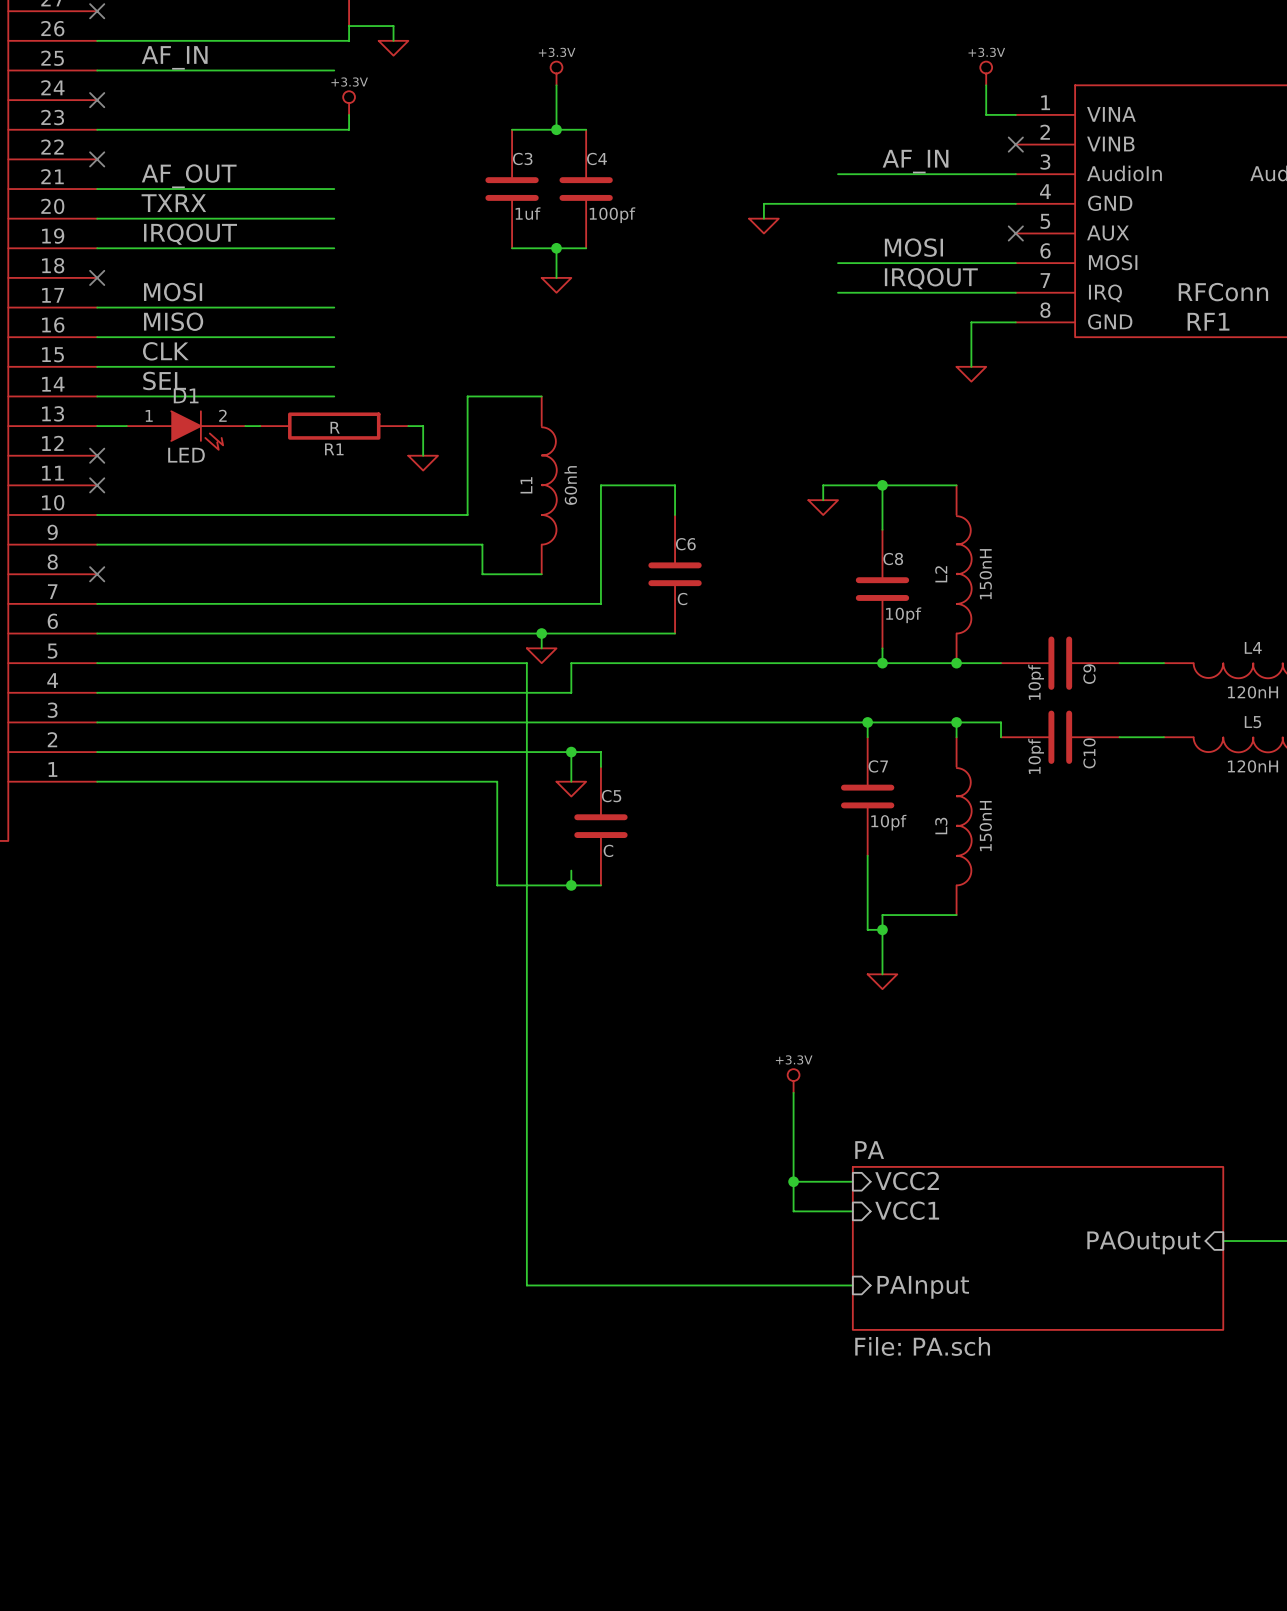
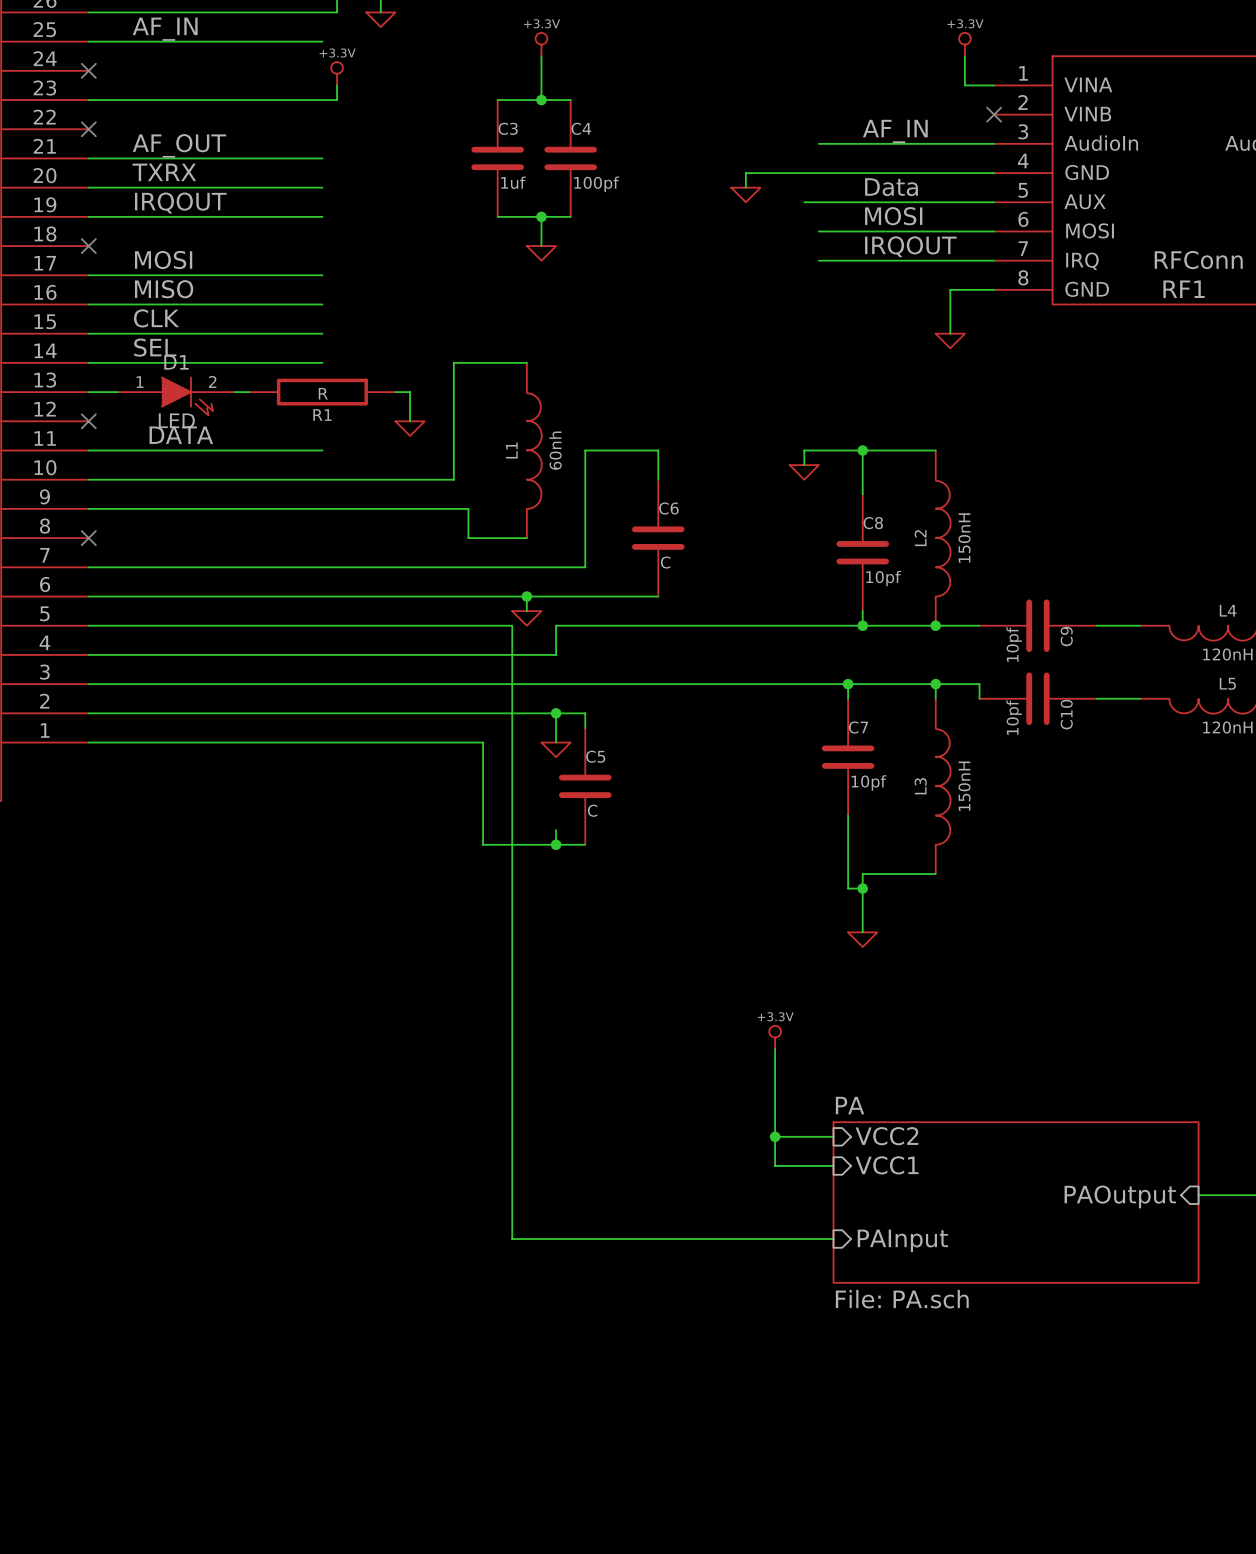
label: none -> Data (891, 187)
wire: none -> (804, 202) (994, 202)
no-connect mark: (1015, 233) -> none
label: none -> DATA (181, 435)
wire: none -> (88, 450) (322, 450)
no-connect mark: (97, 485) -> none

